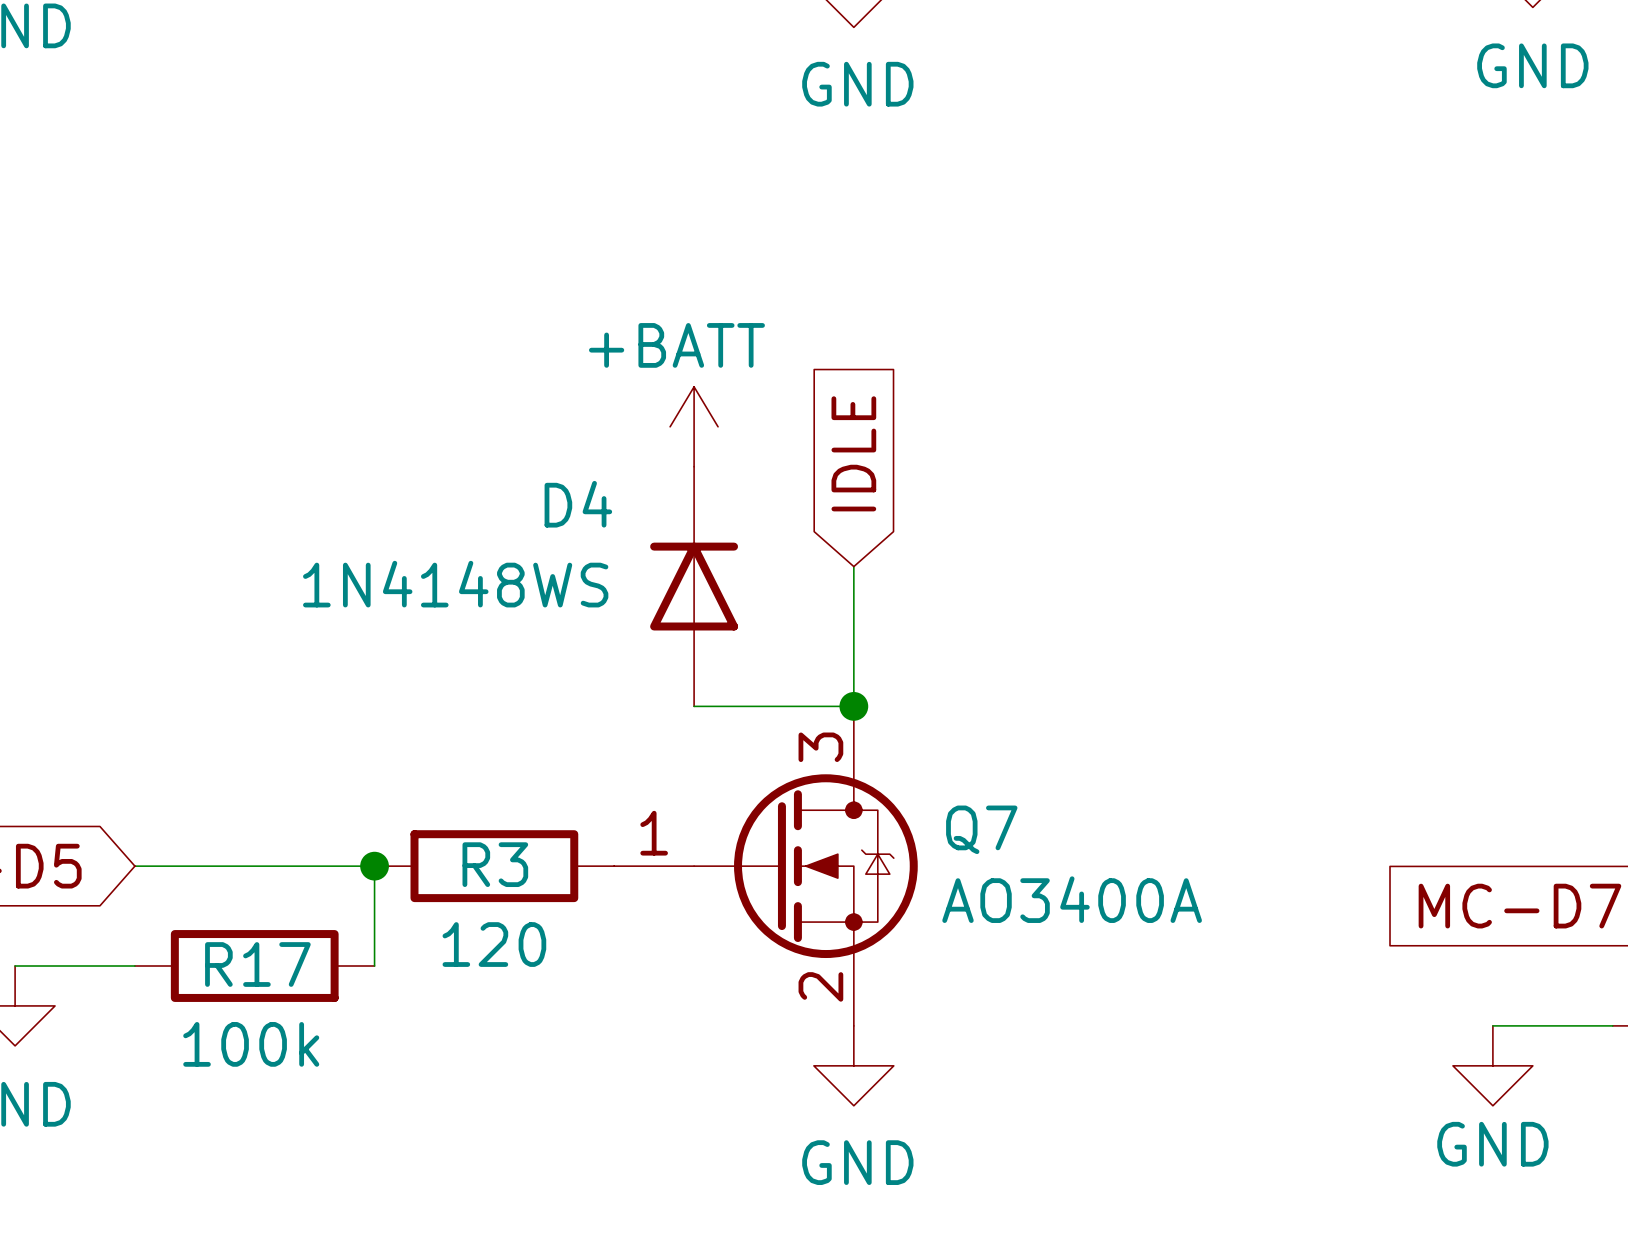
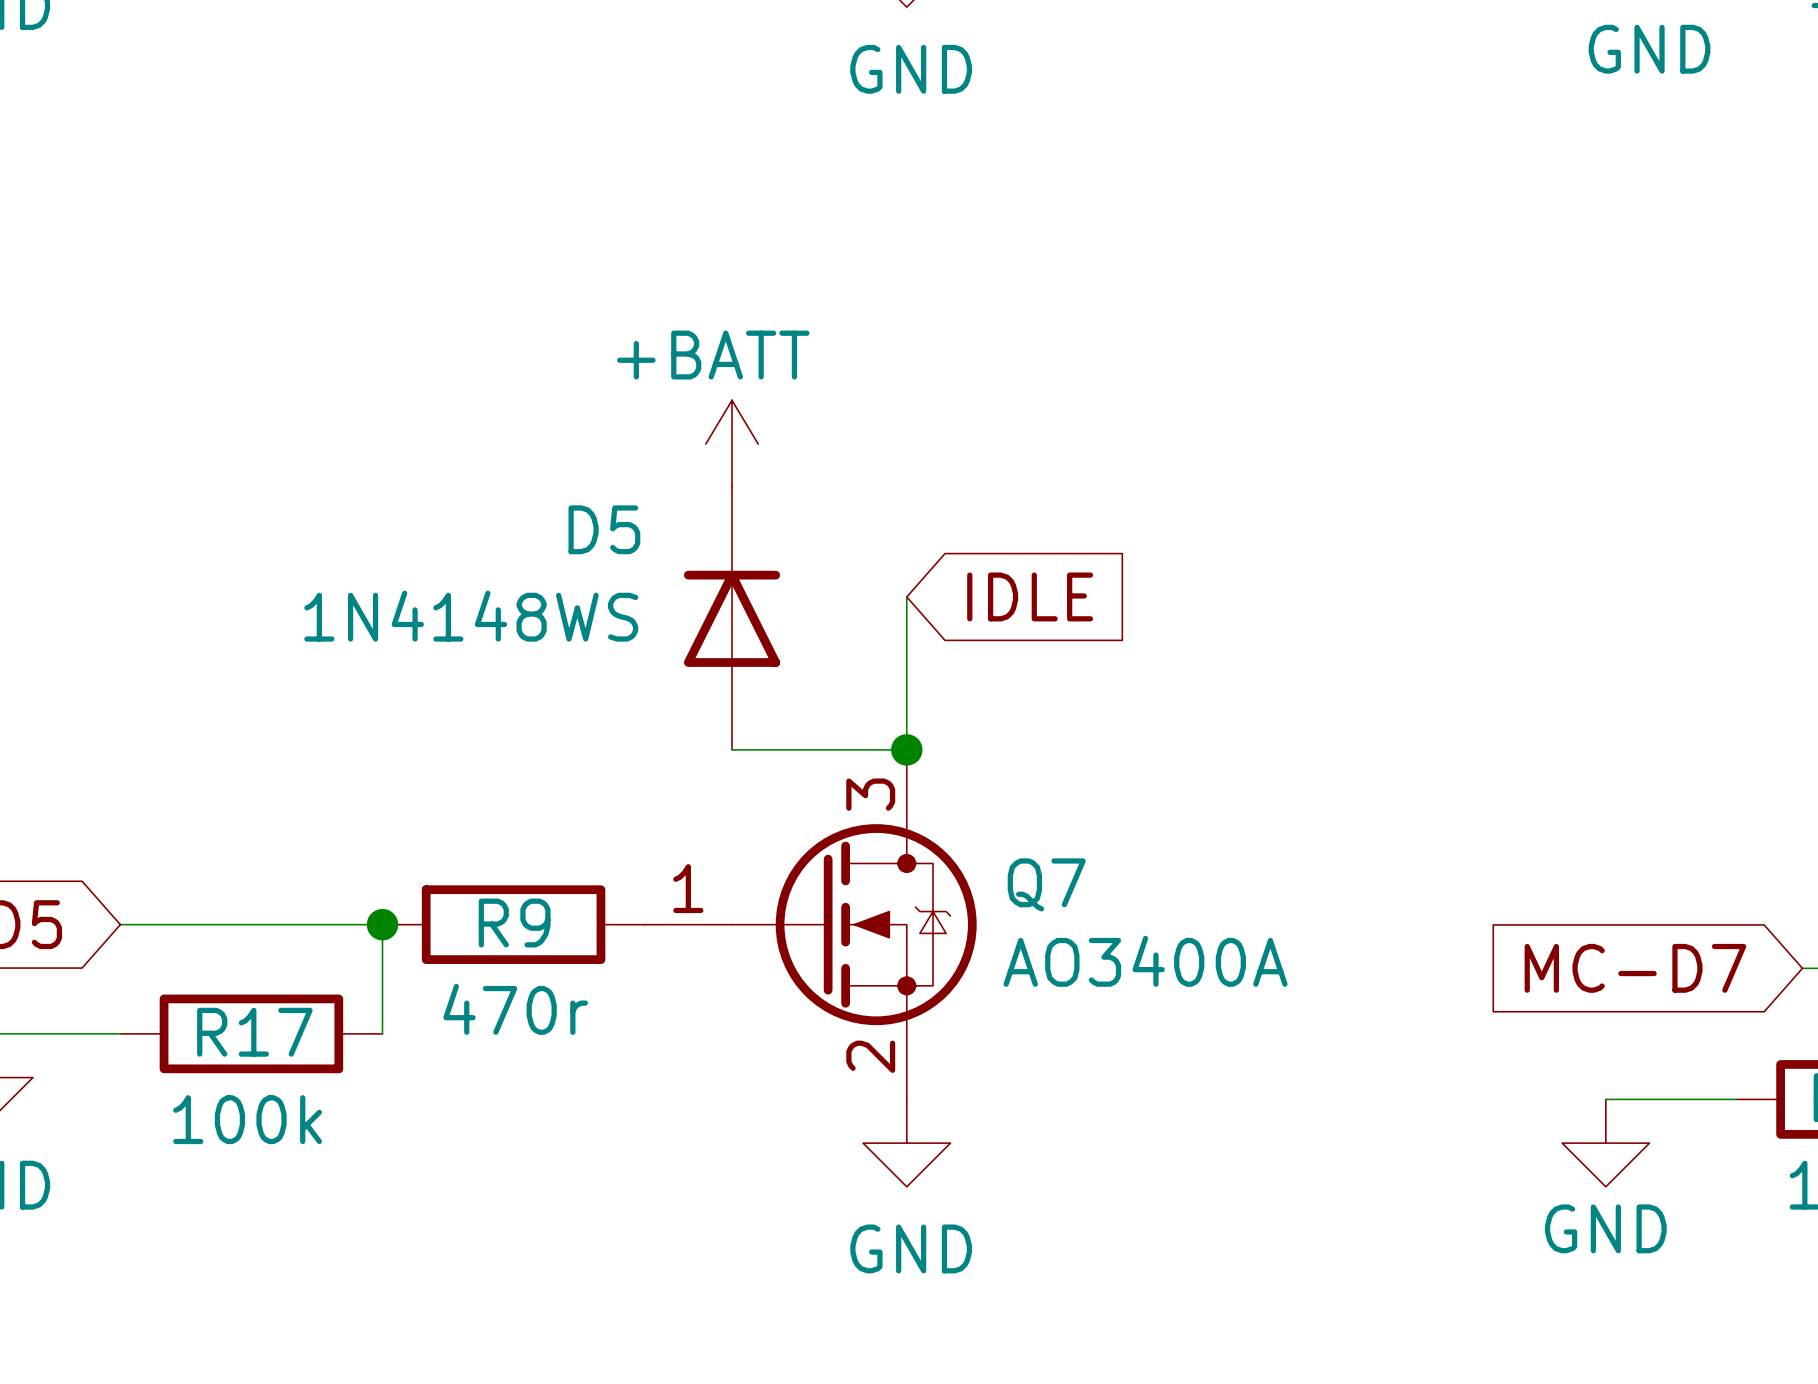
global label rotation: 0° (853, 453) -> 90° clockwise (1030, 596)
D4 name: D4 (578, 504) -> D5 (604, 529)
R3 name: R3 (495, 864) -> R9 (514, 923)
R3 value: 120 (494, 944) -> 470r (515, 1009)

